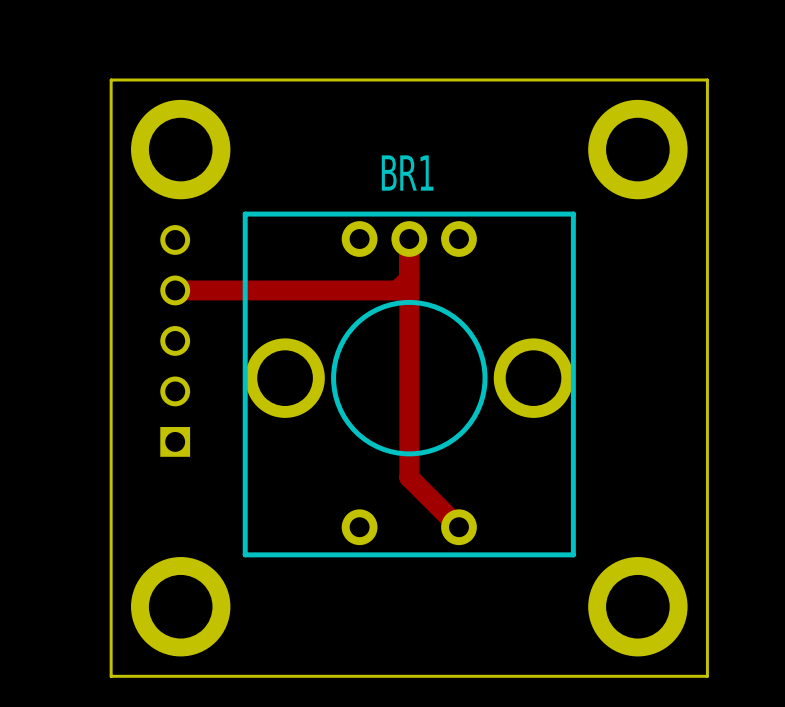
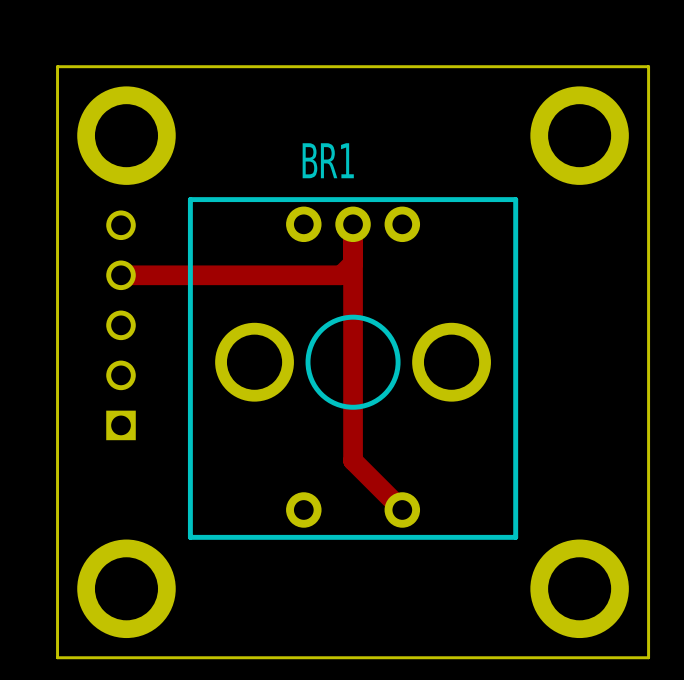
BR1 footprint: [242, 211, 576, 558] -> [187, 197, 519, 540]

